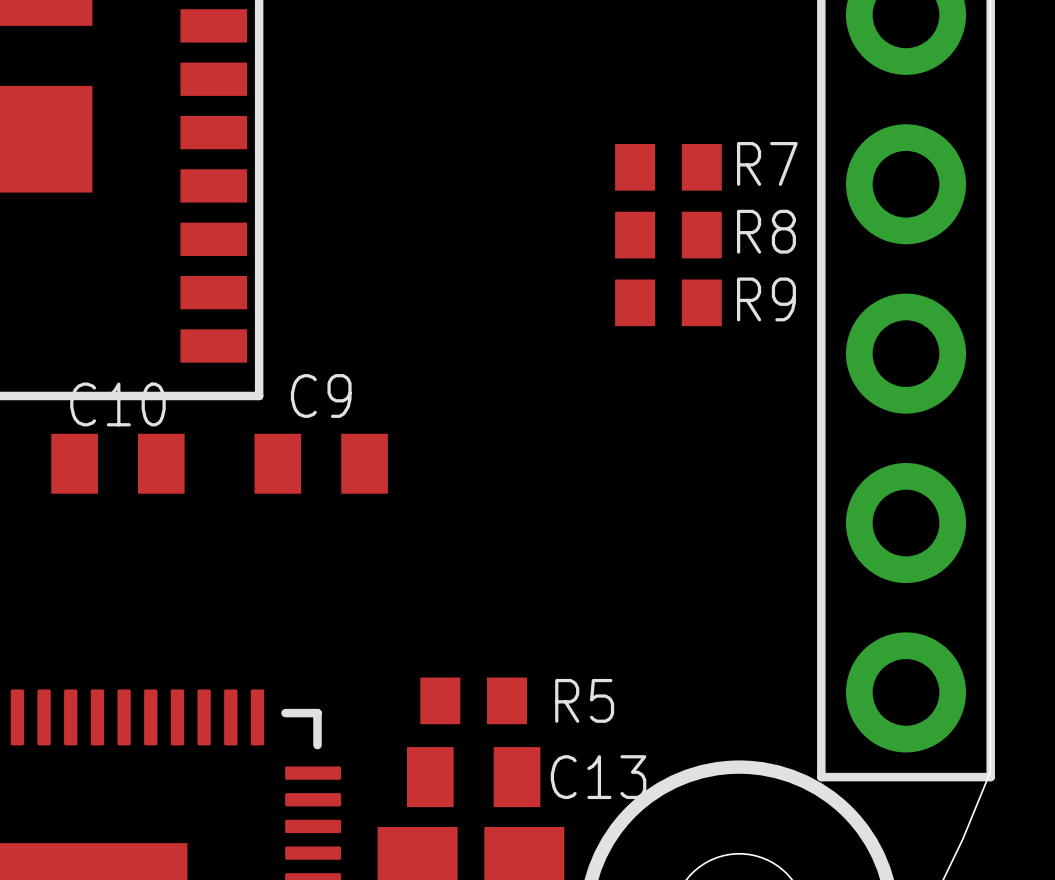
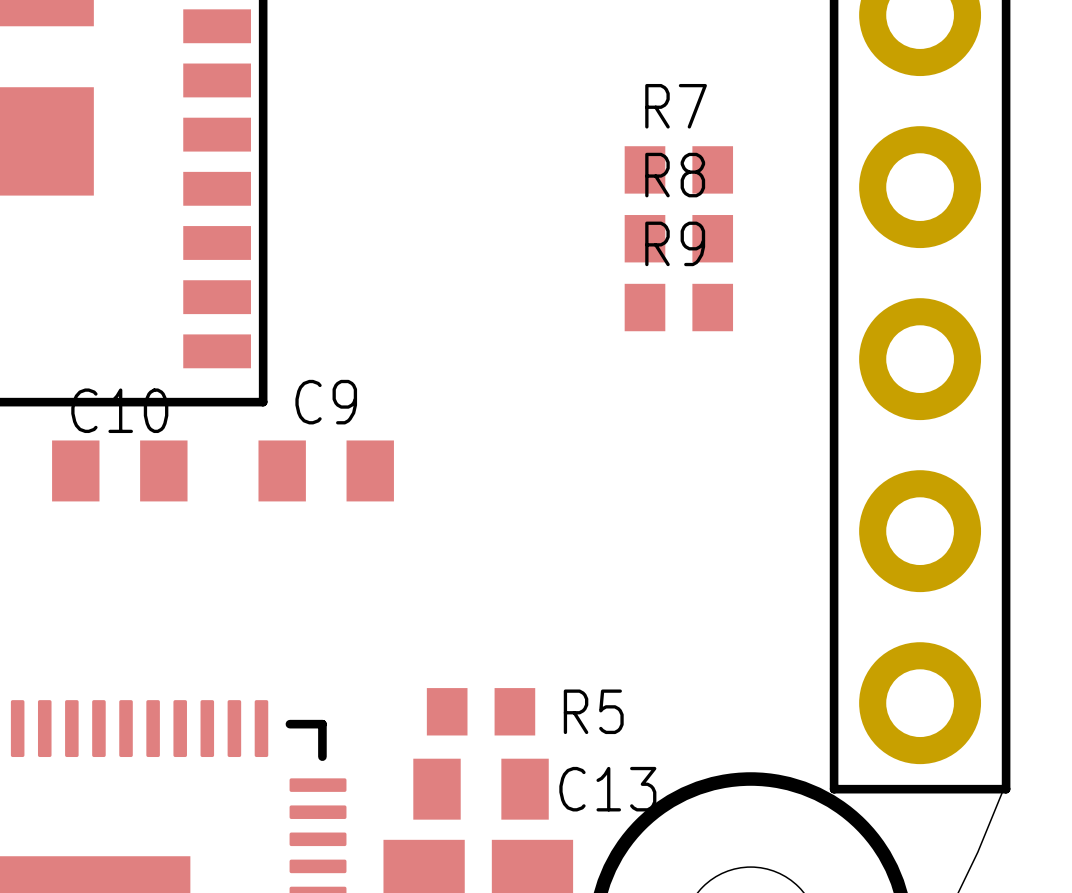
R7 name position: R7 (767, 163) -> R7 (676, 106)
R8 name position: R8 (766, 231) -> R8 (675, 175)
R9 name position: R9 (766, 299) -> R9 (675, 243)

